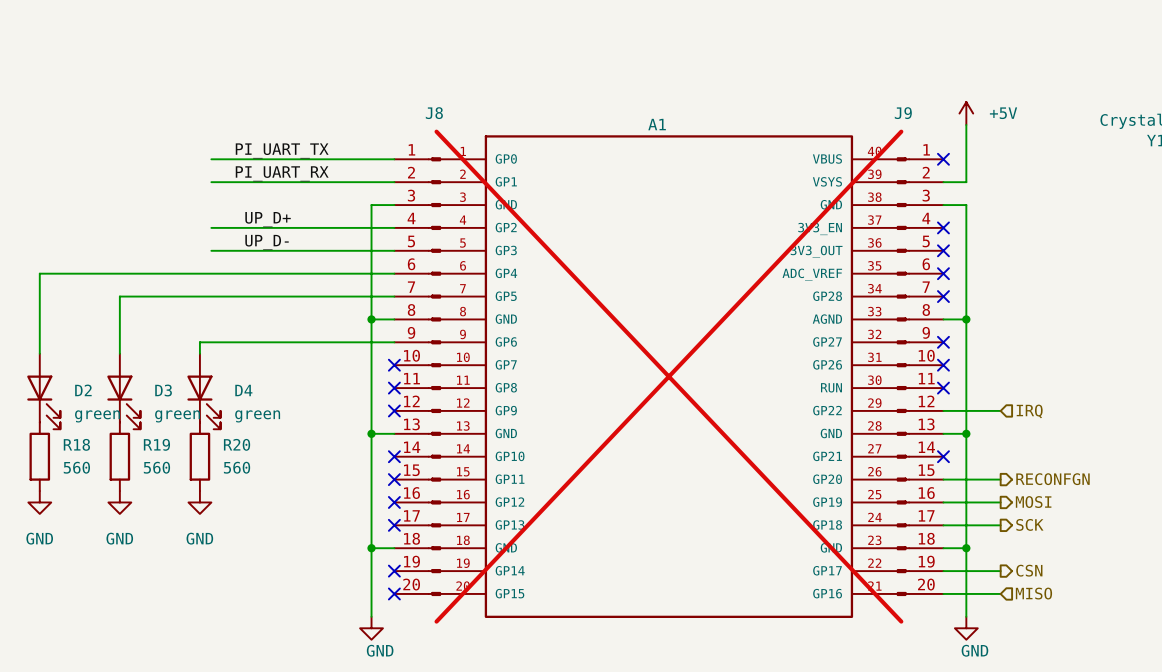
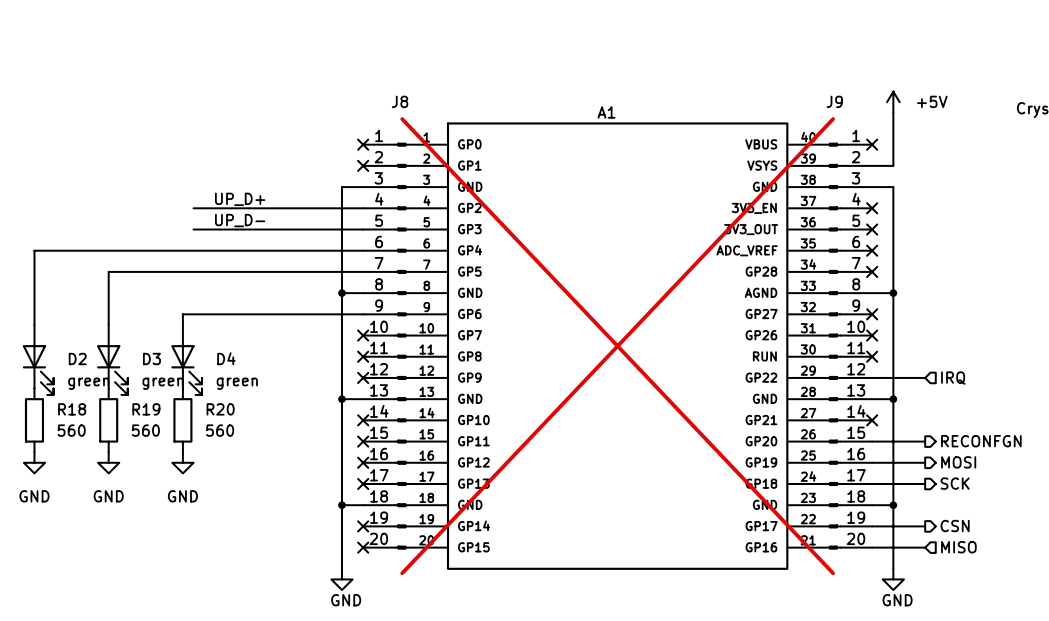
label: PI_UART_TX (282, 150) -> none
wire: (211, 159) (394, 159) -> none
no-connect mark: none -> (363, 144)
label: PI_UART_RX (282, 173) -> none
wire: (211, 182) (394, 182) -> none
no-connect mark: none -> (363, 165)

